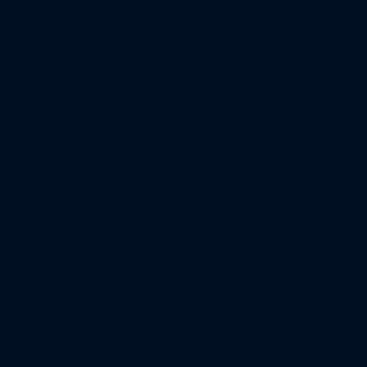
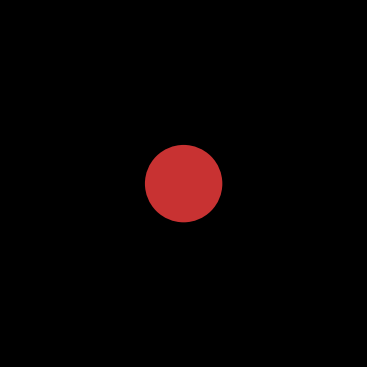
part: none -> (183, 183)

